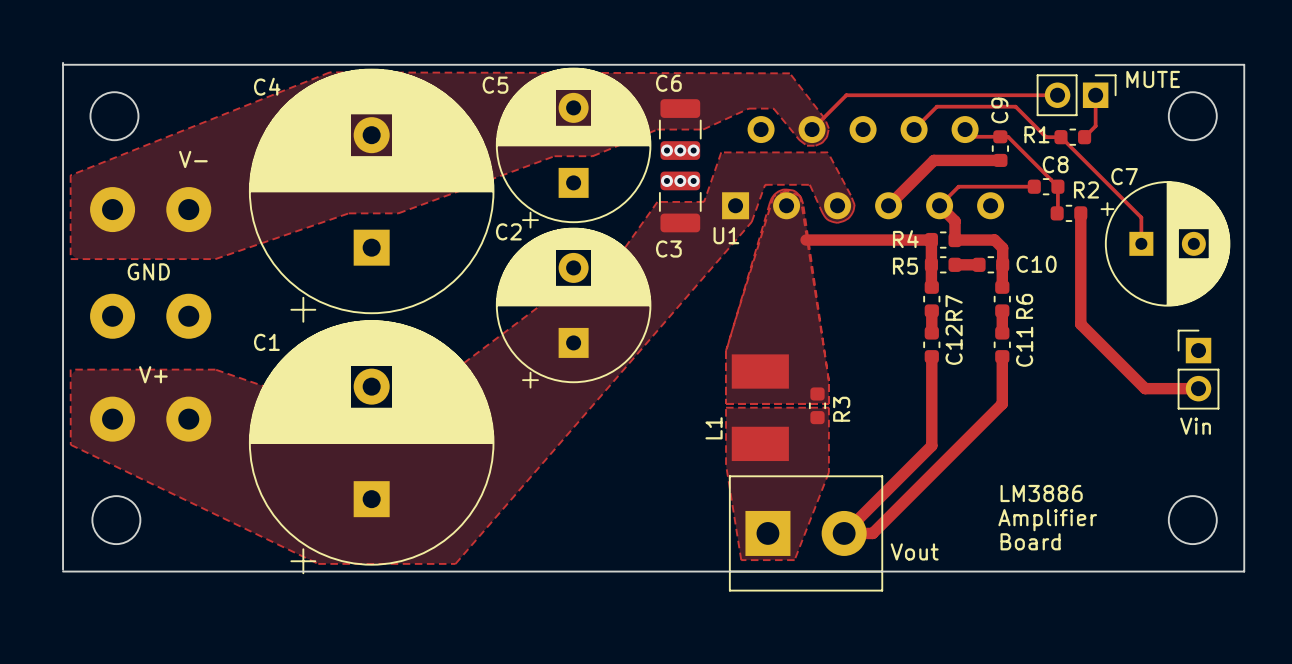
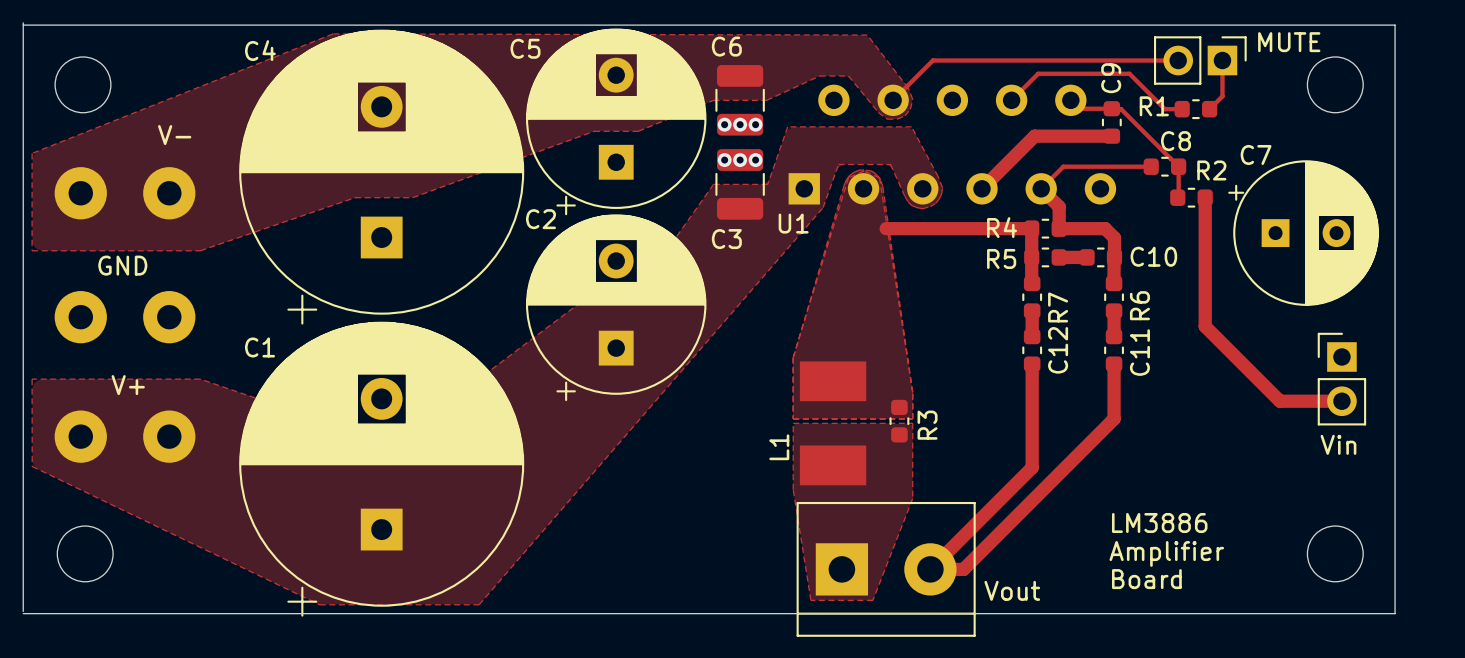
track: (1060, 137) (1141, 217) (1141, 243) -> none

